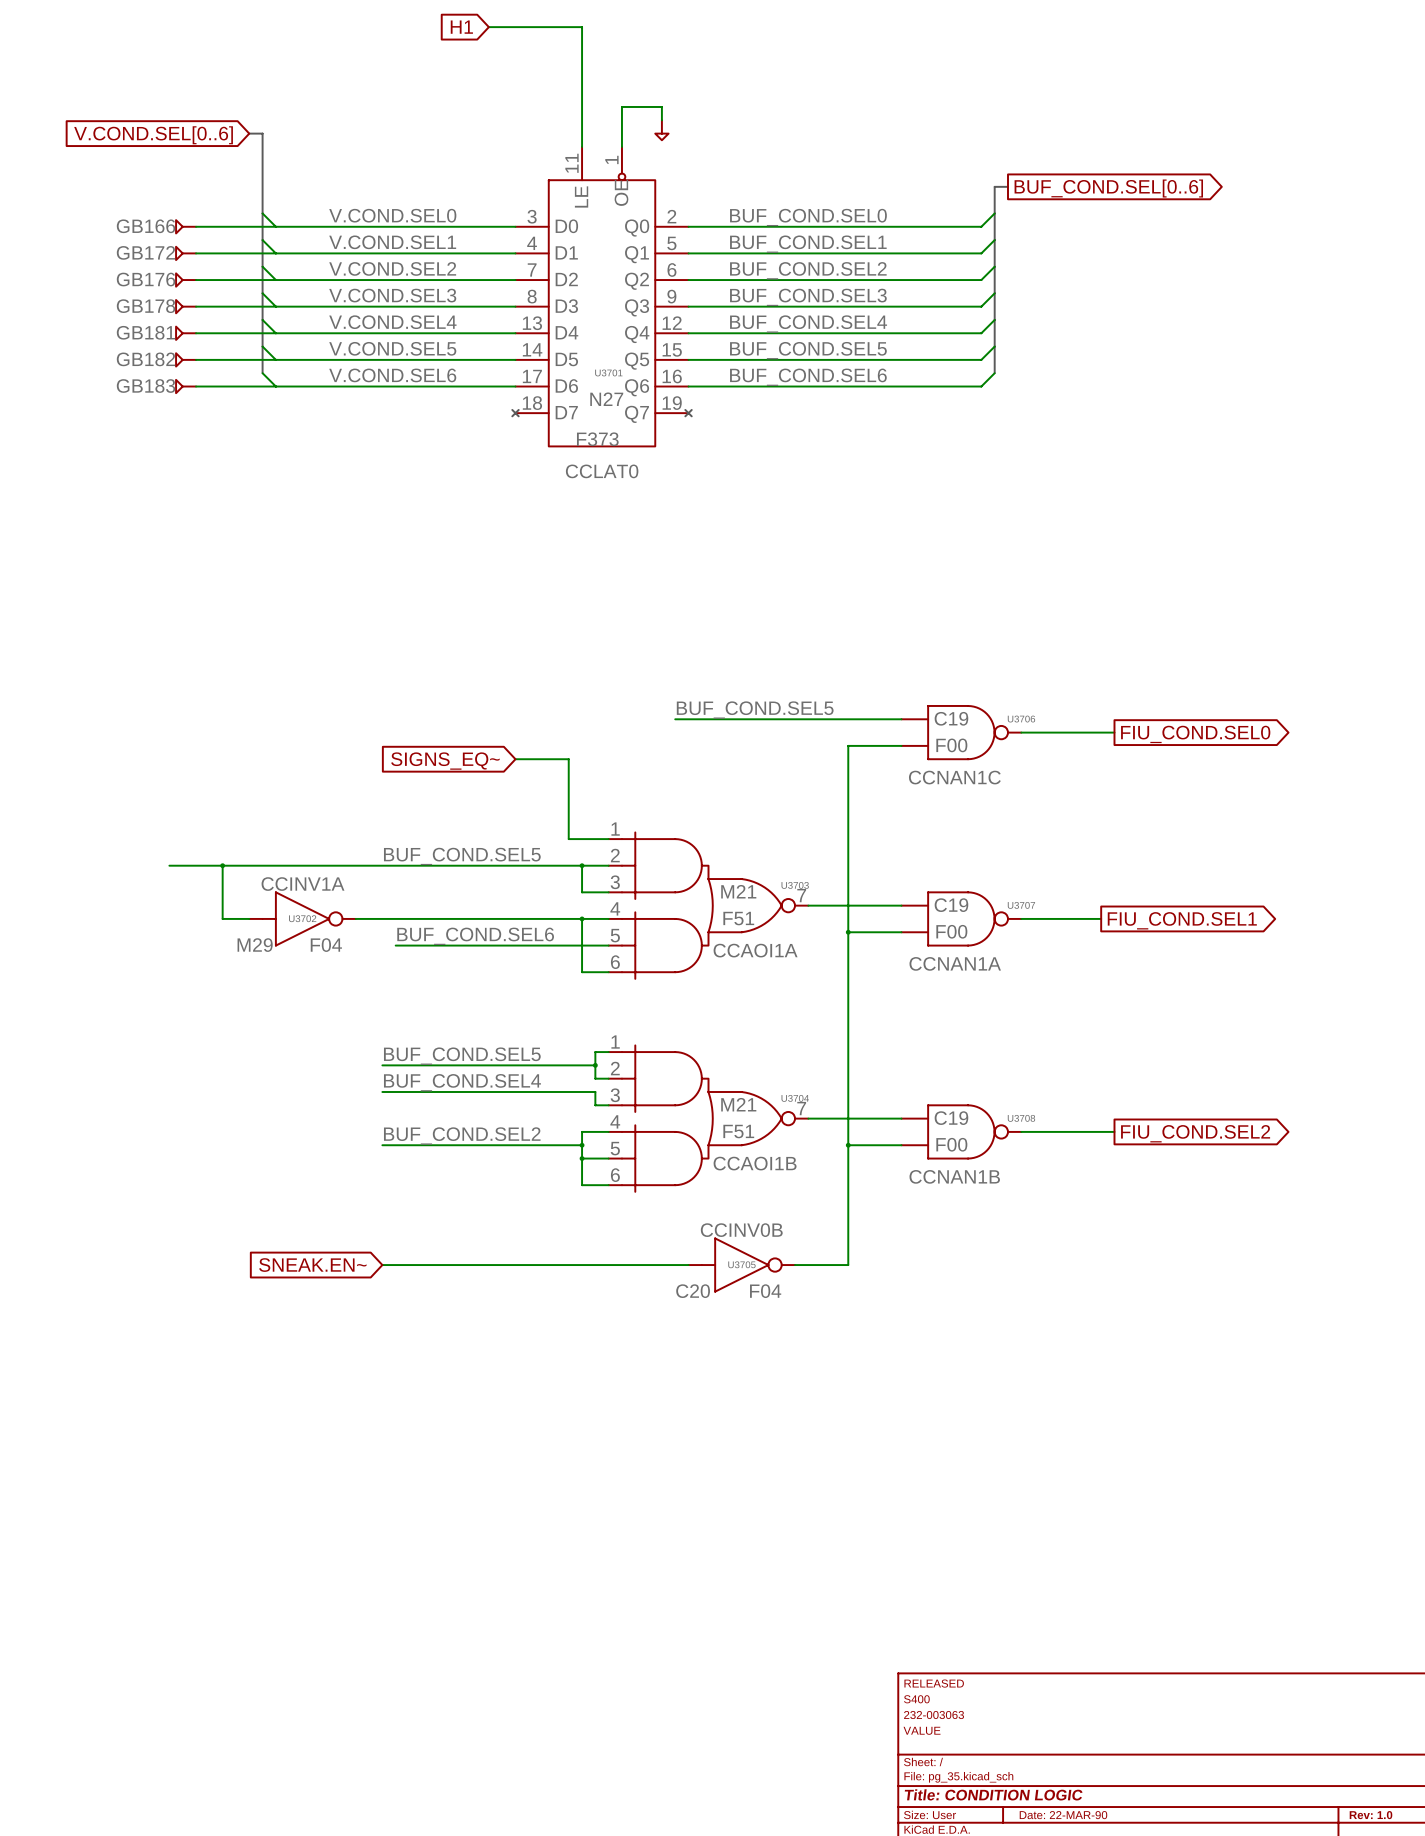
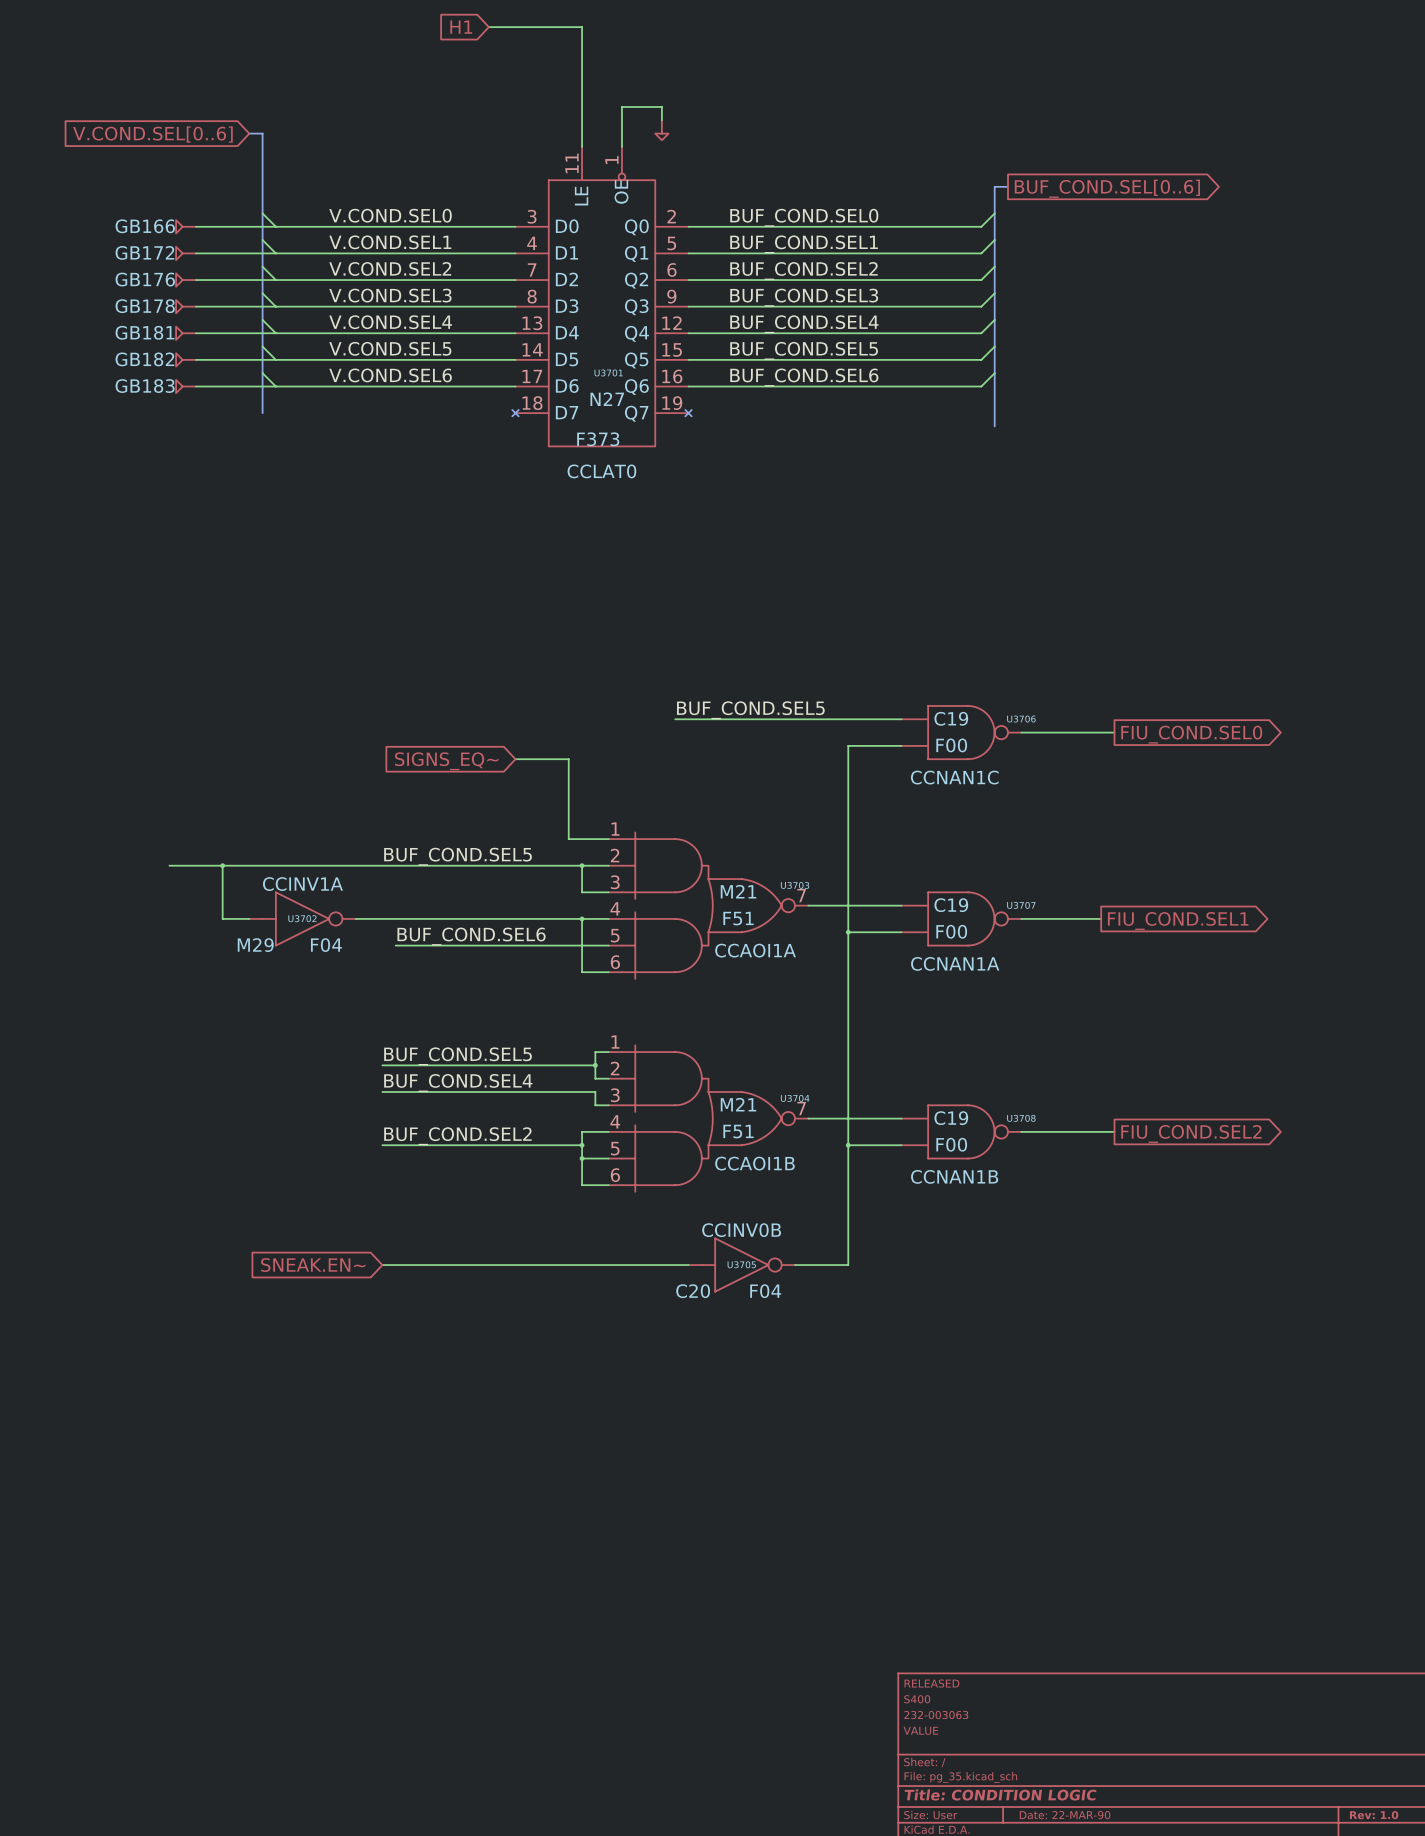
bus: none -> (262, 373) (262, 413)
bus: none -> (994, 373) (994, 426)

